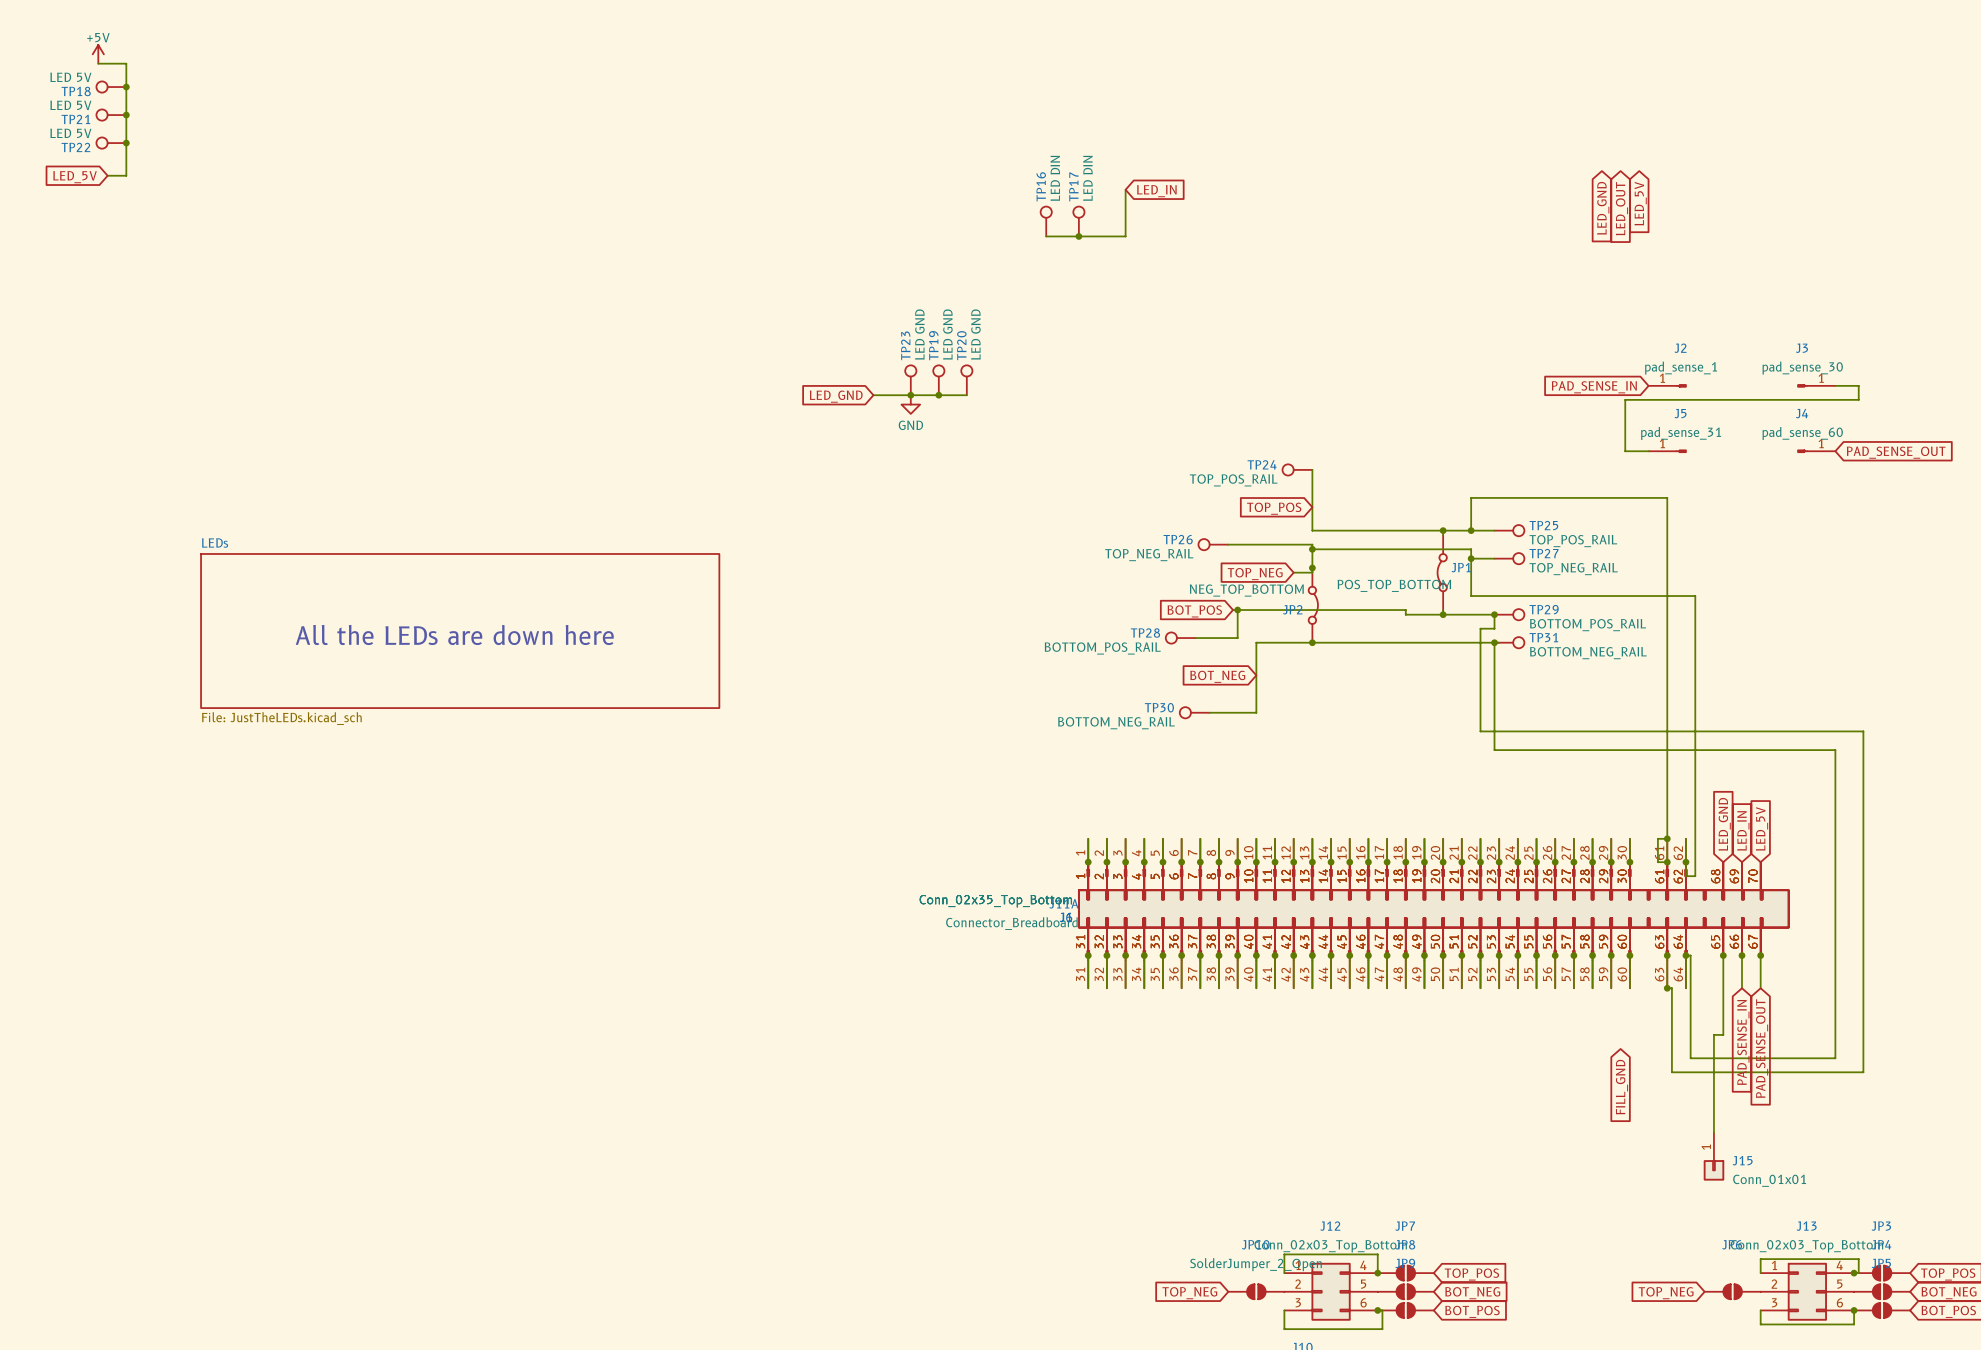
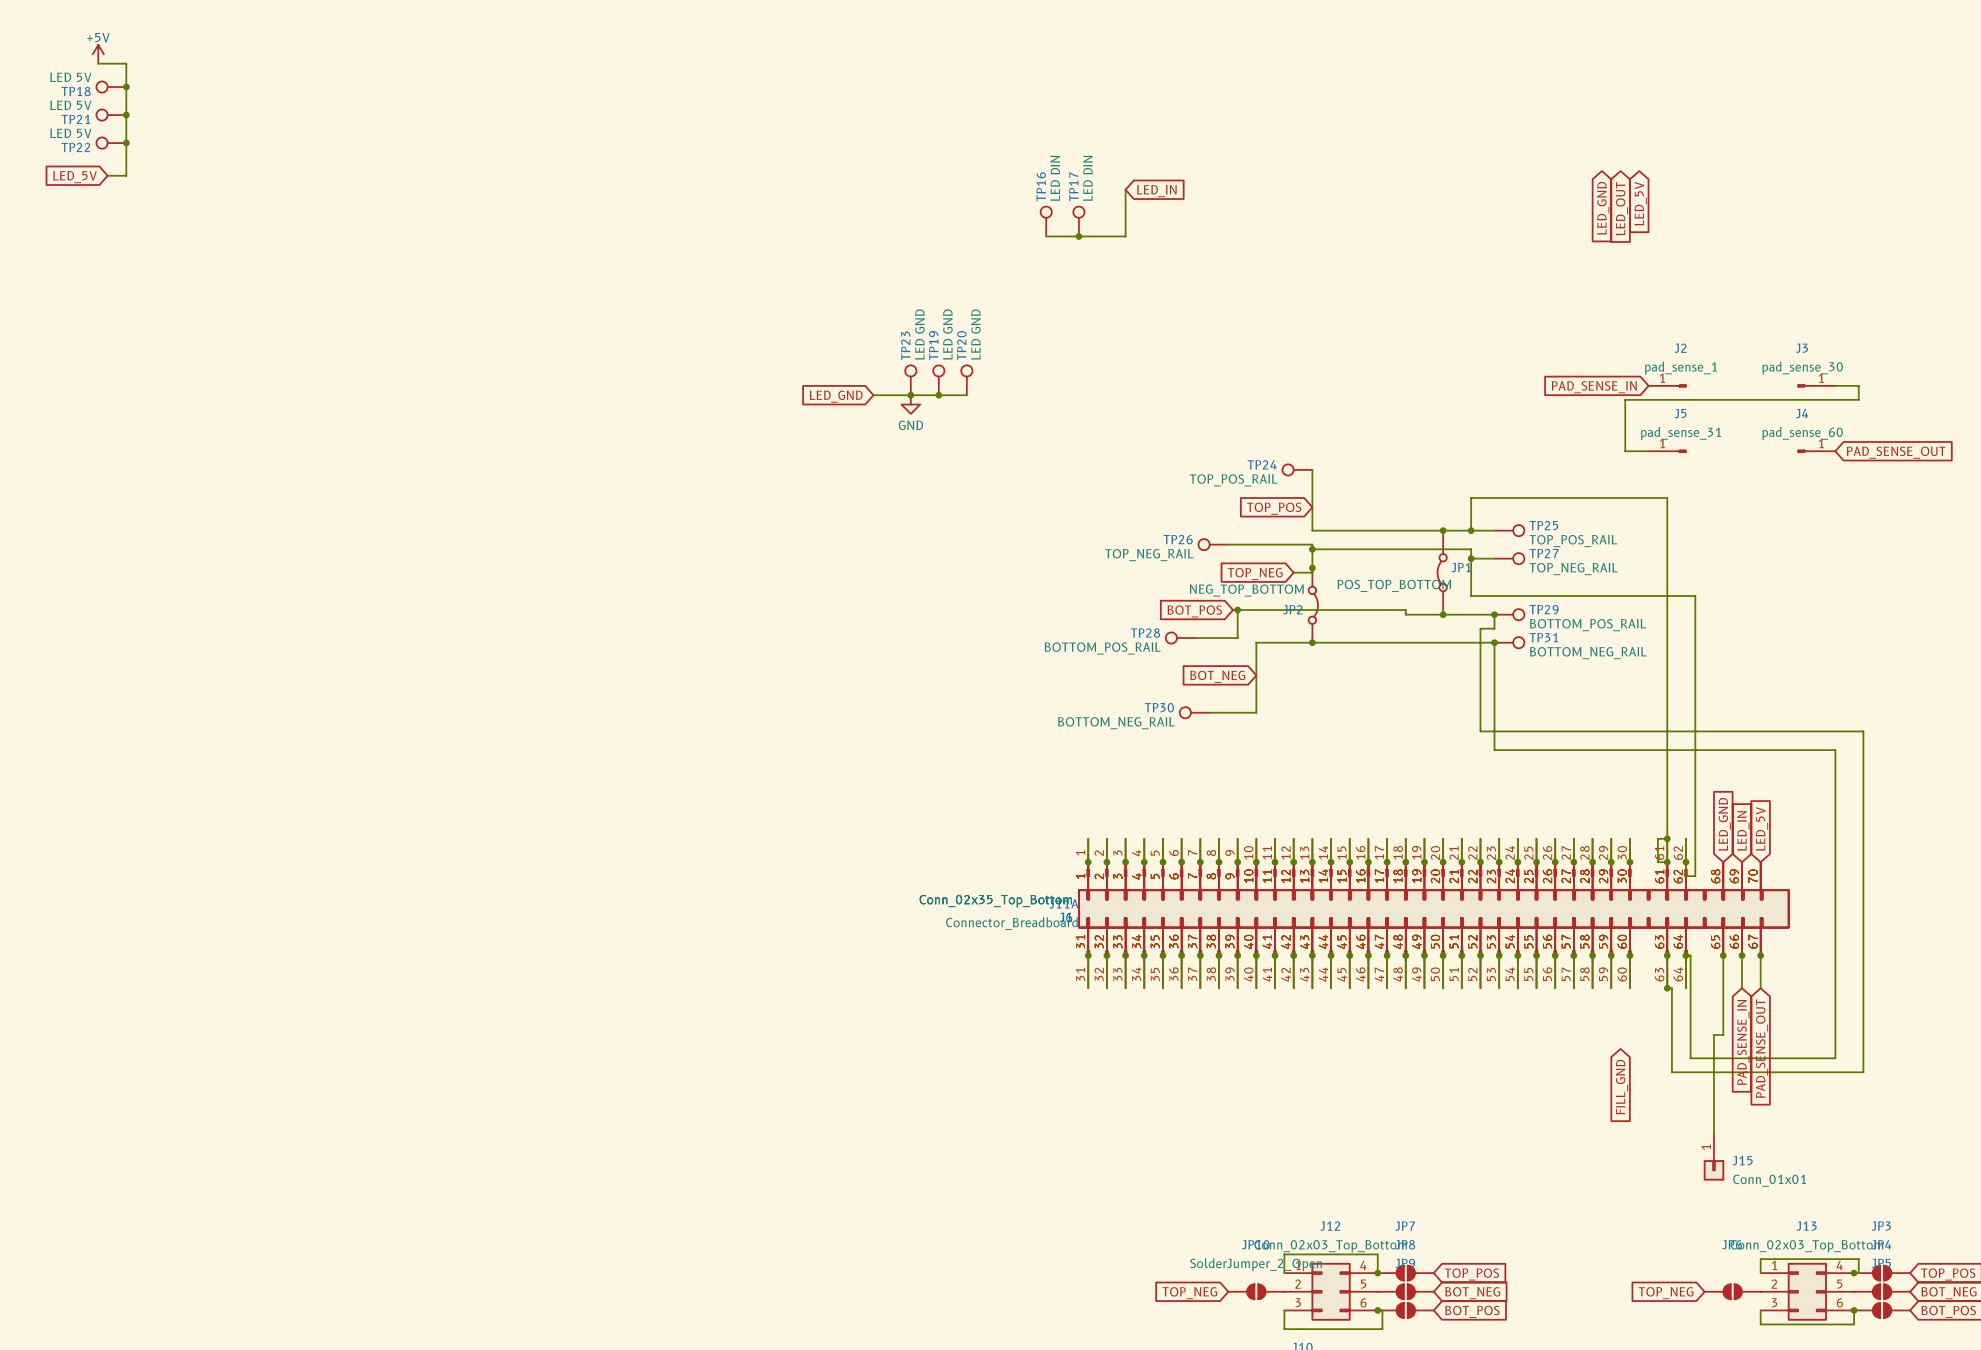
sheet LEDs: File: JustTheLEDs.kicad_sch (460, 631) -> none
text: All the LEDs are down here (454, 634) -> none

